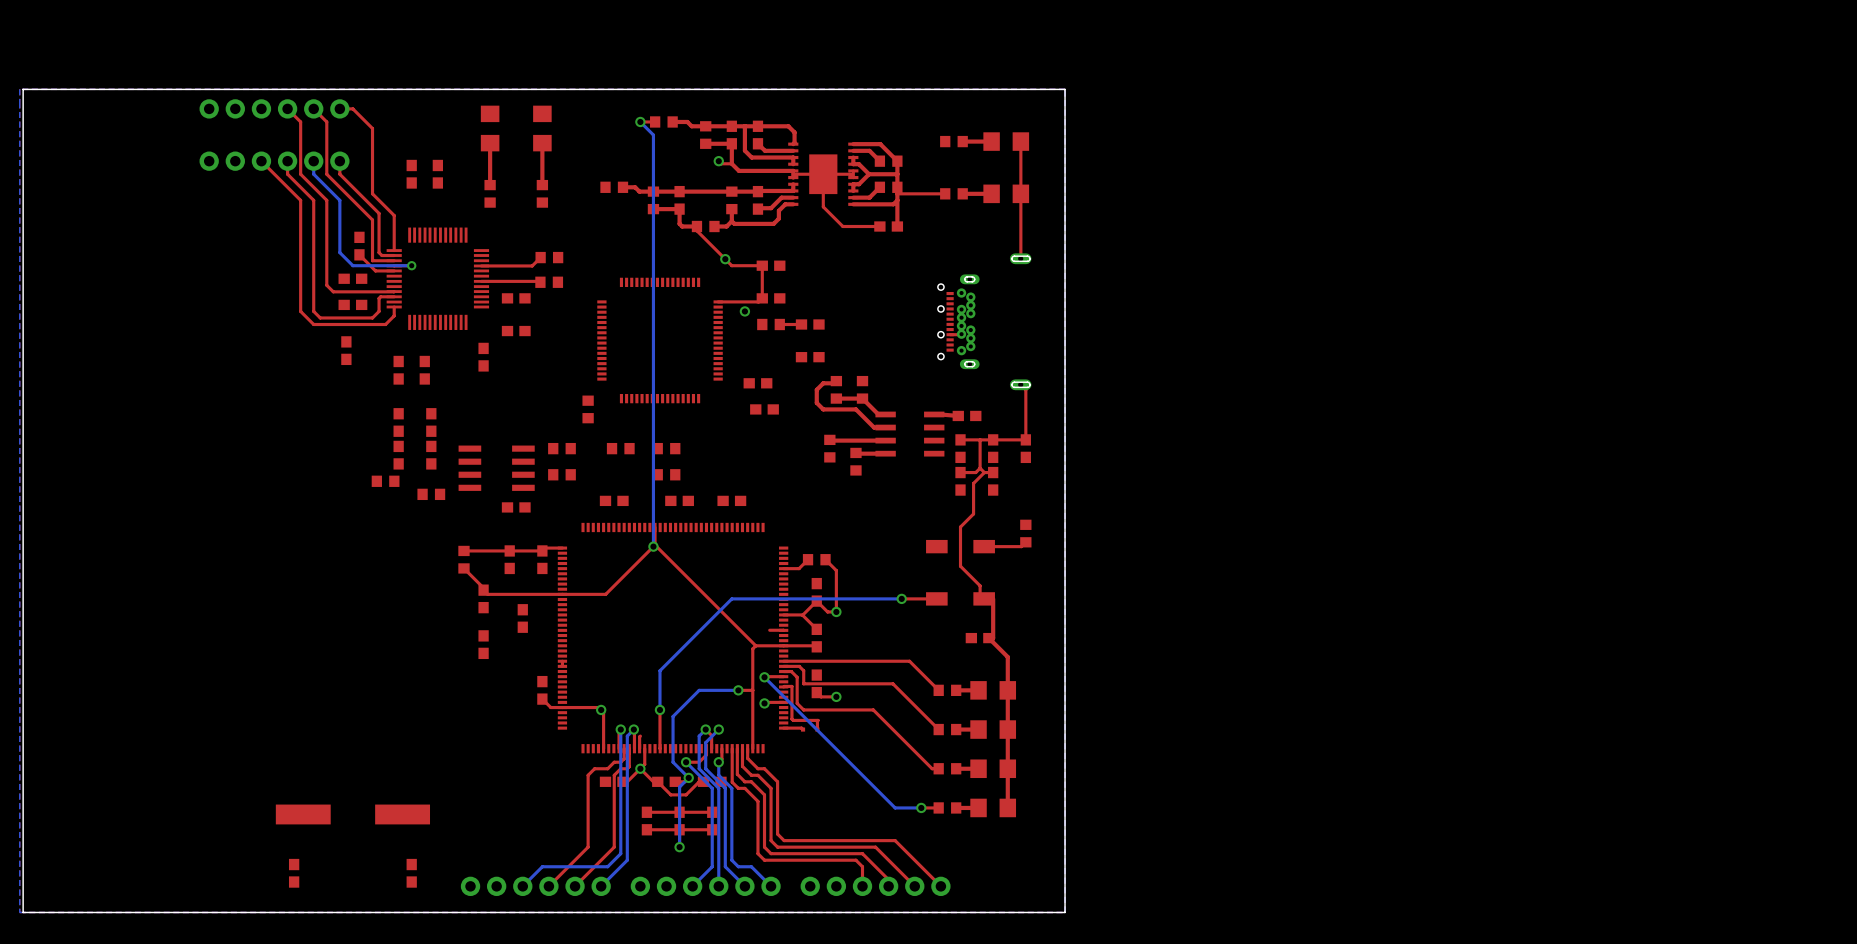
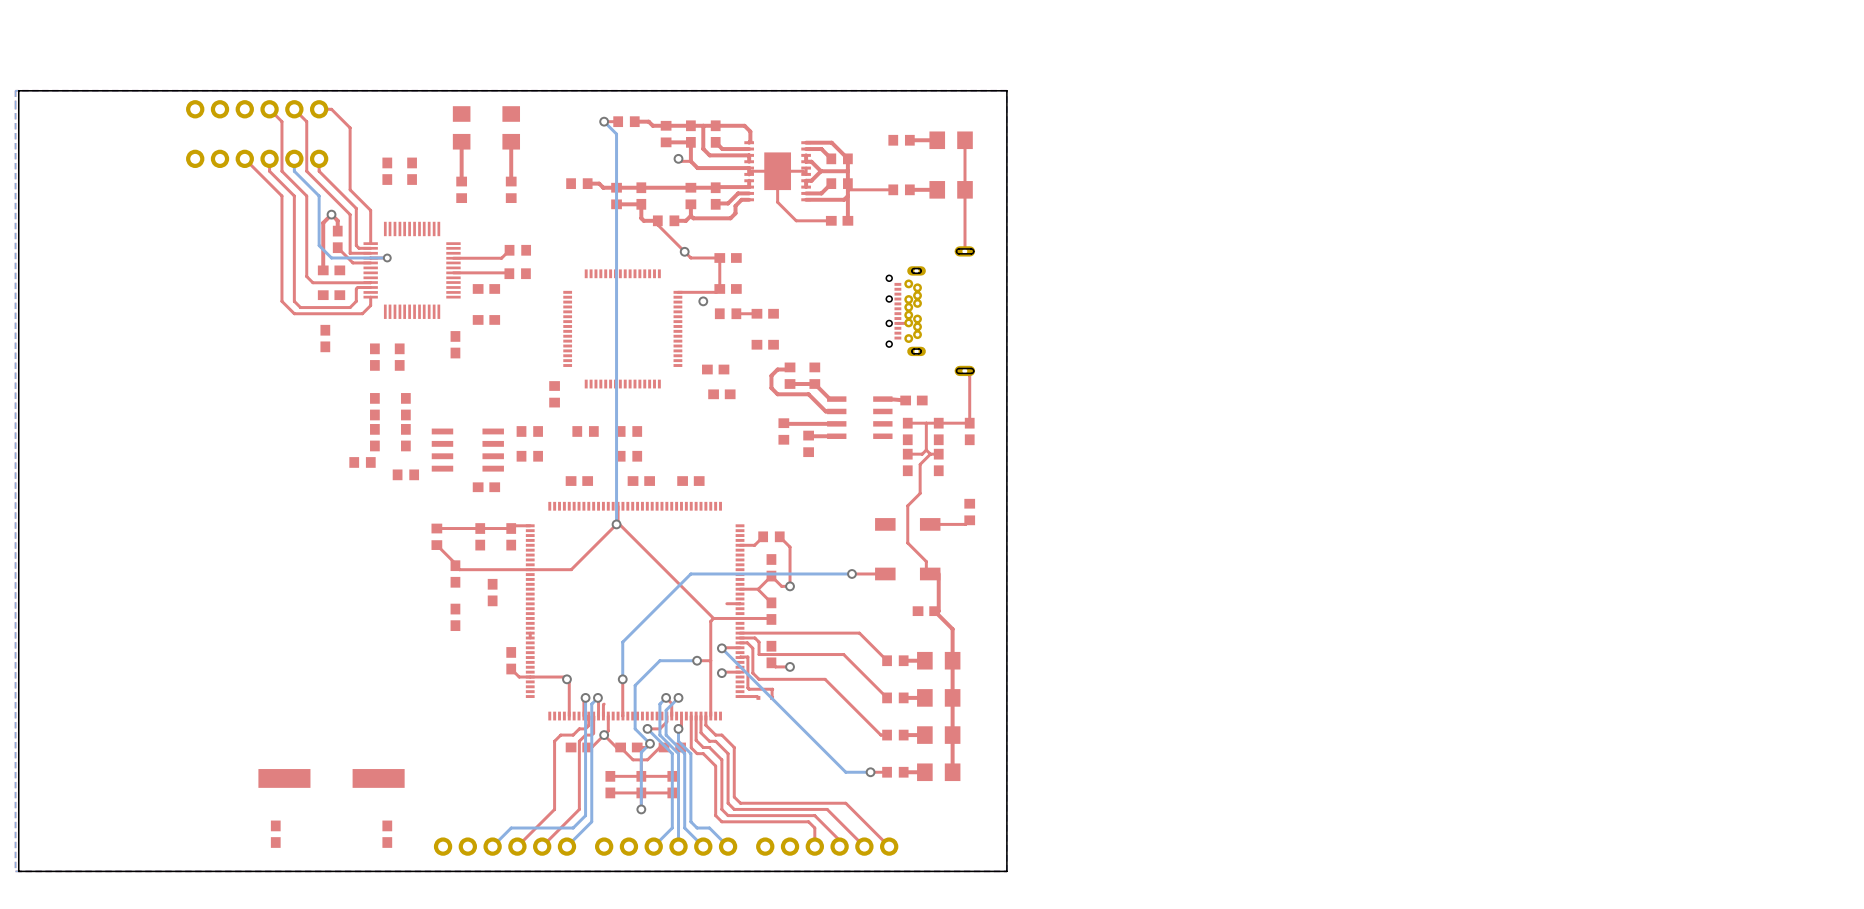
via: none -> (331, 214)
top track: none -> (337, 231) (337, 220) (331, 214) (323, 222) (323, 270)

